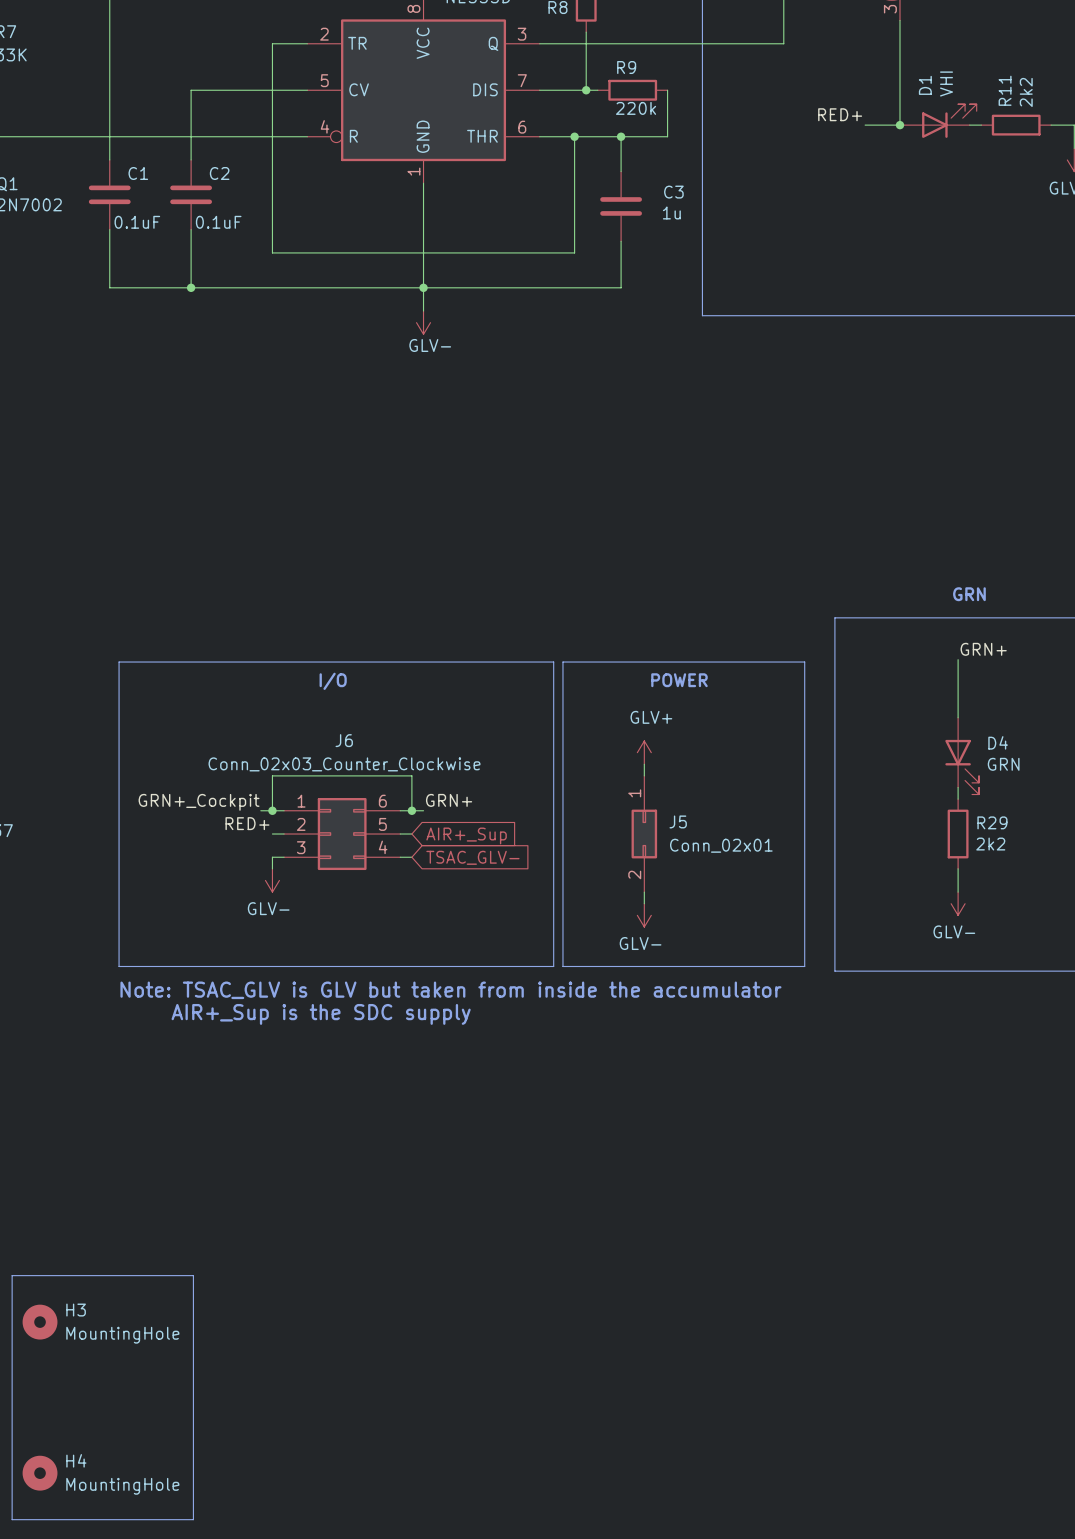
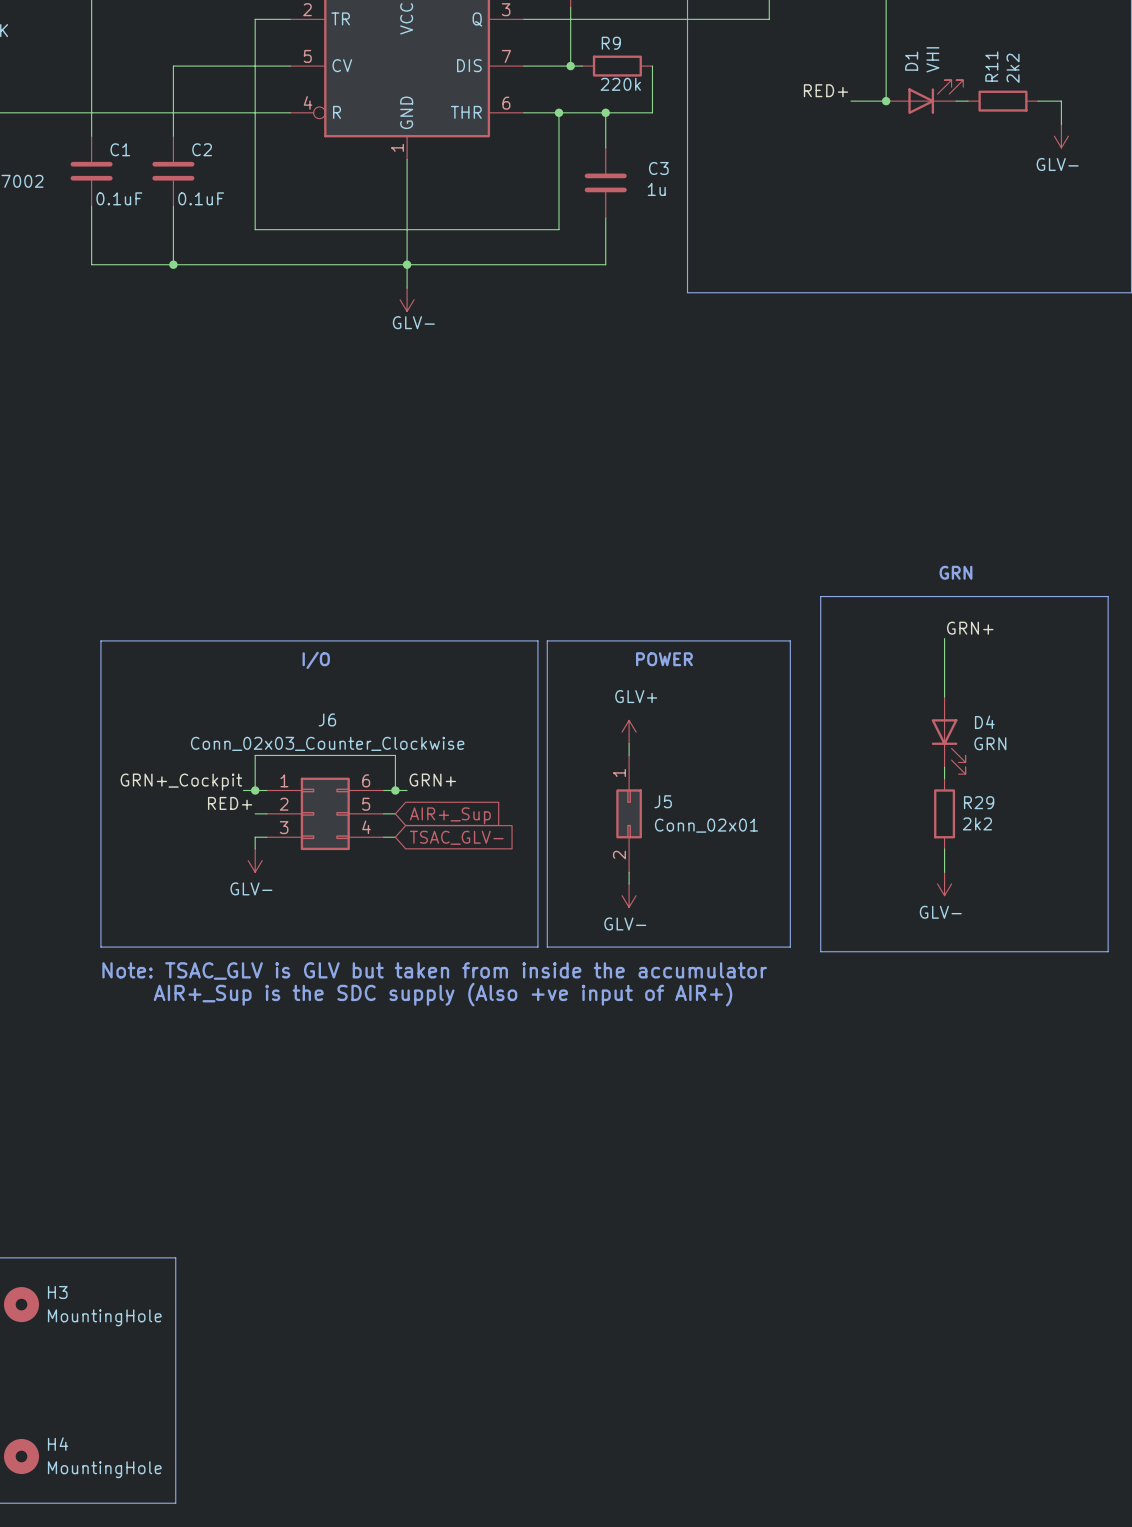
text: AIR+_Sup is the SDC supply (321, 1014) -> AIR+_Sup is the SDC supply (Also +ve input of AIR+) (443, 994)

